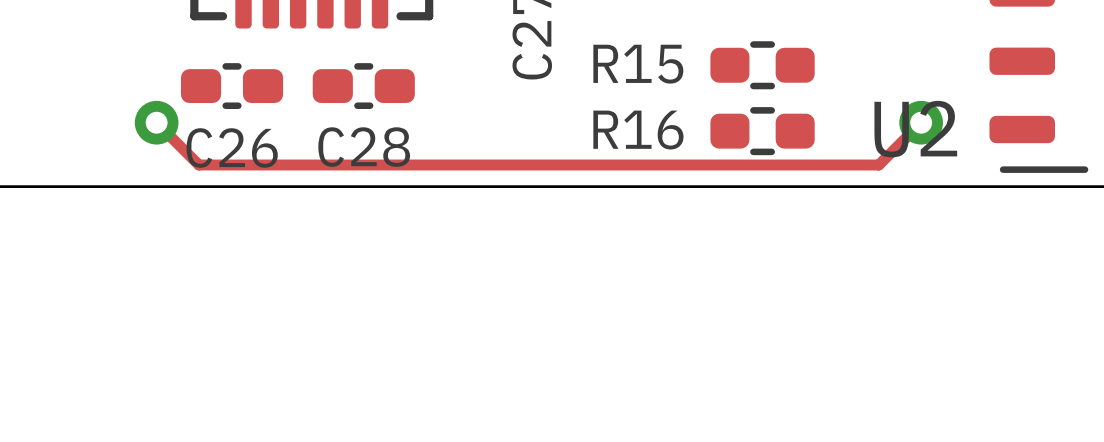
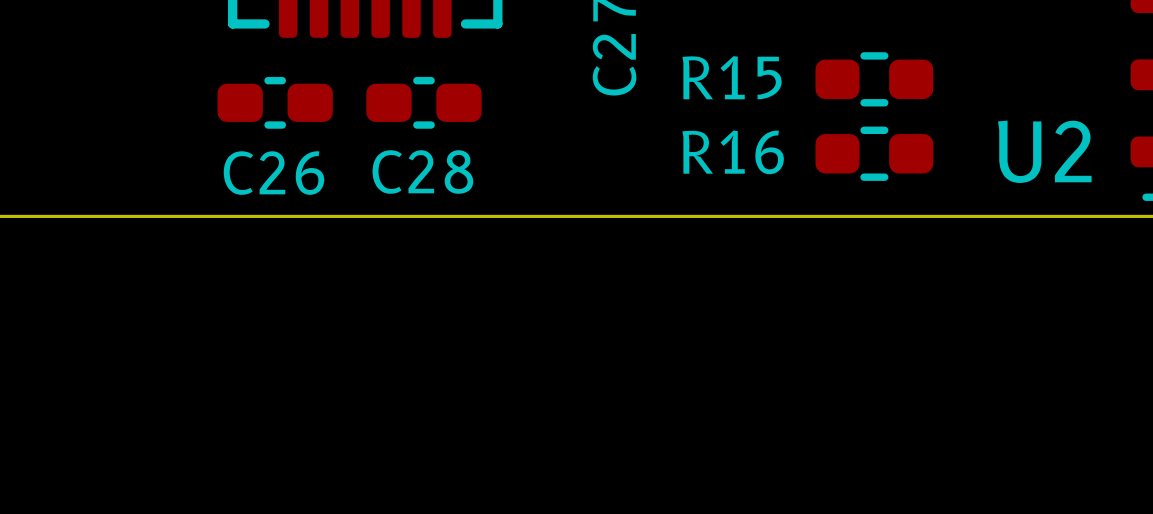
track: (156, 122) (198, 165) (878, 165) (921, 122) -> none
via: (156, 122) -> none
via: (921, 122) -> none

